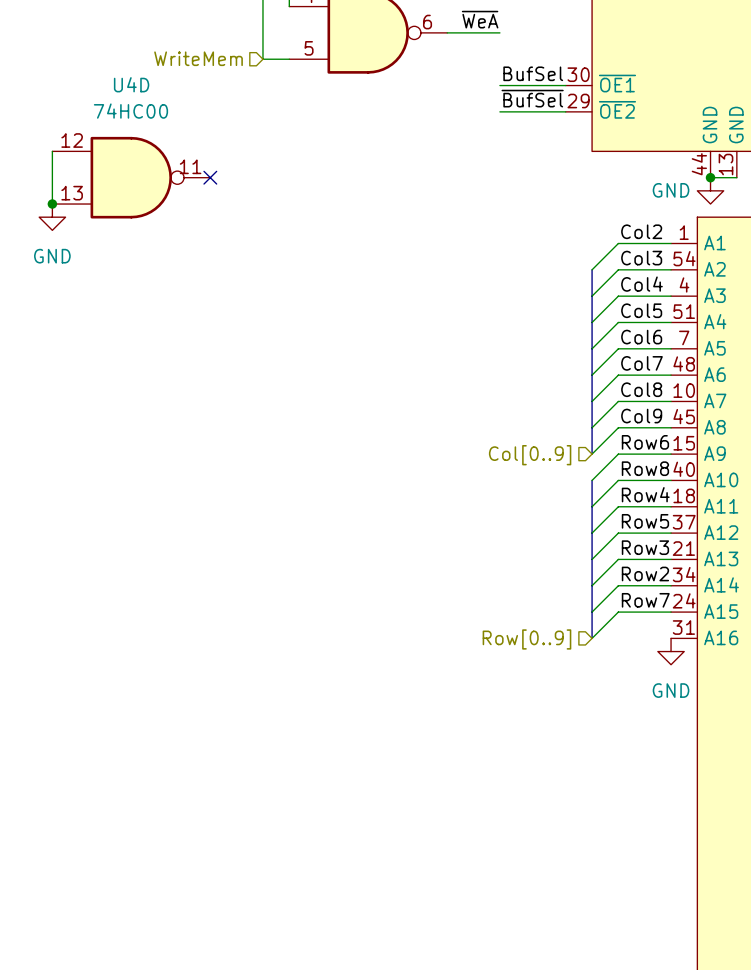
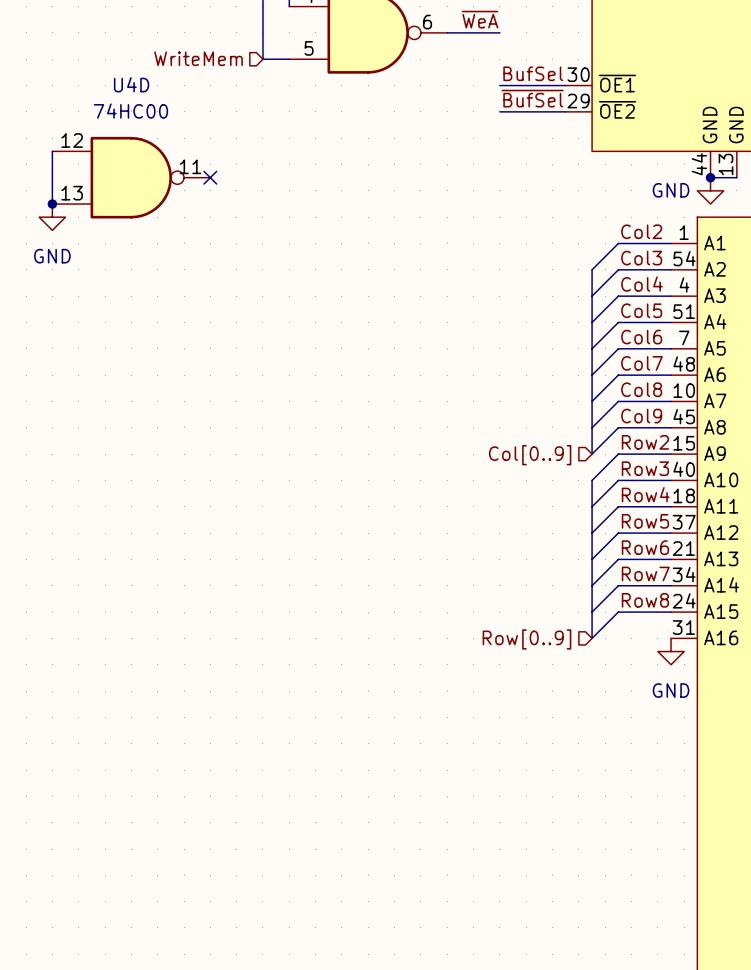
label: Row6 (645, 442) -> Row2 (645, 442)
label: Row8 (645, 468) -> Row3 (645, 468)
label: Row3 (645, 547) -> Row6 (645, 547)
label: Row2 (645, 574) -> Row7 (645, 574)
label: Row7 (645, 600) -> Row8 (645, 600)

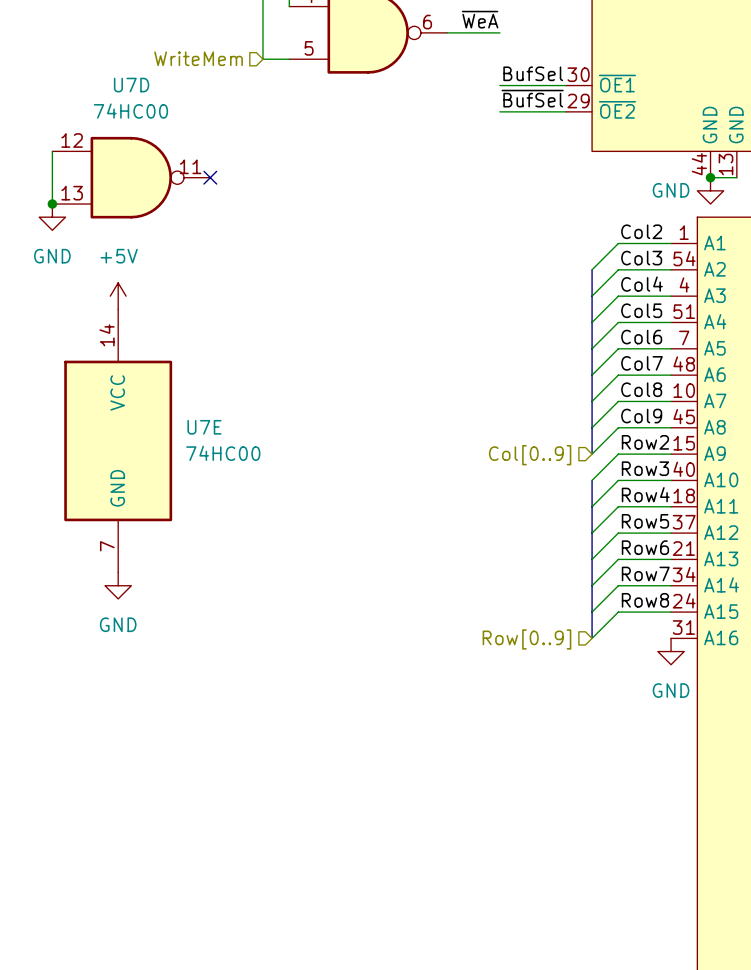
U4D name: U4D (131, 84) -> U7D (131, 85)
power symbol: none -> +5V (118, 296)
U7E: none -> 74HC00 (118, 440)
power symbol: none -> GND (118, 585)

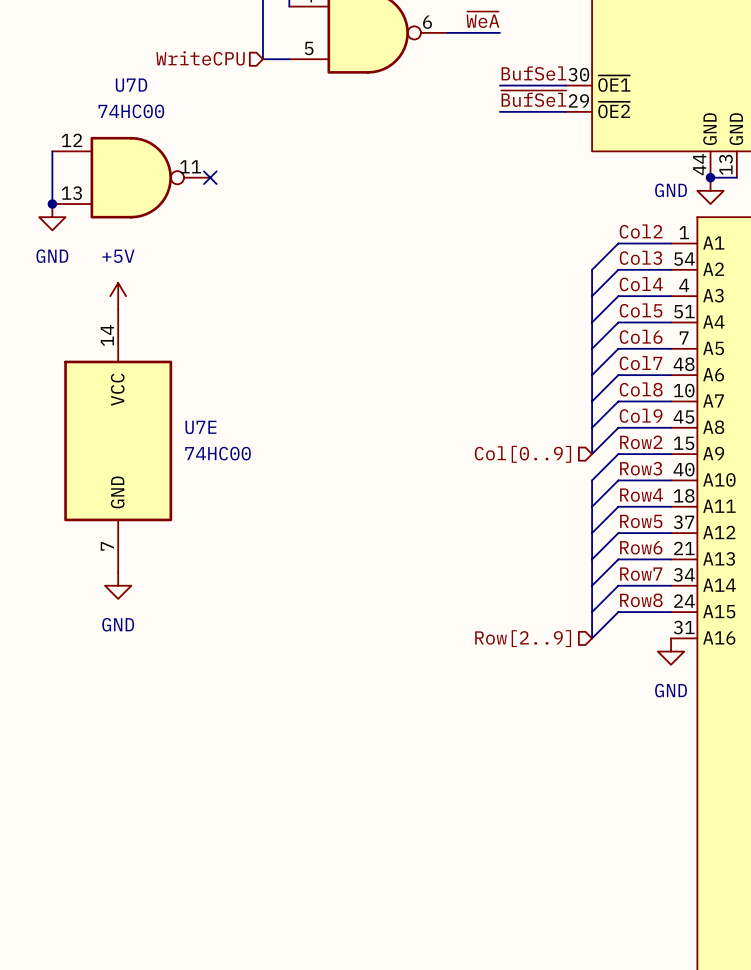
hierarchical label: WriteMem (198, 58) -> WriteCPU (200, 58)
hierarchical label: Row[0..9] (526, 639) -> Row[2..9] (523, 638)

